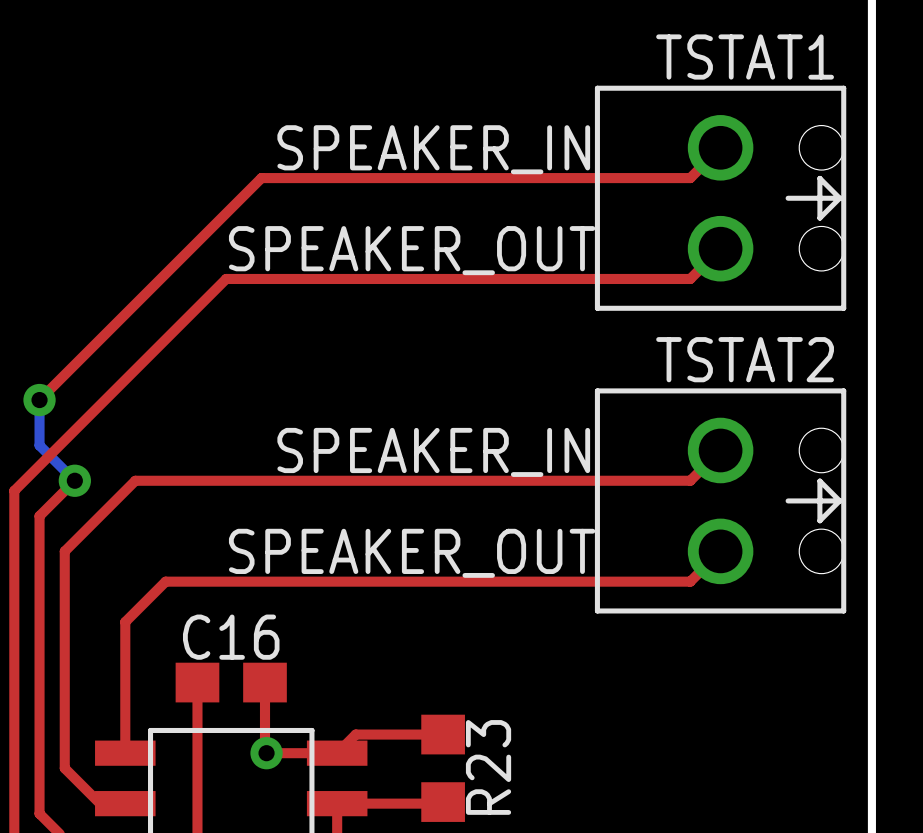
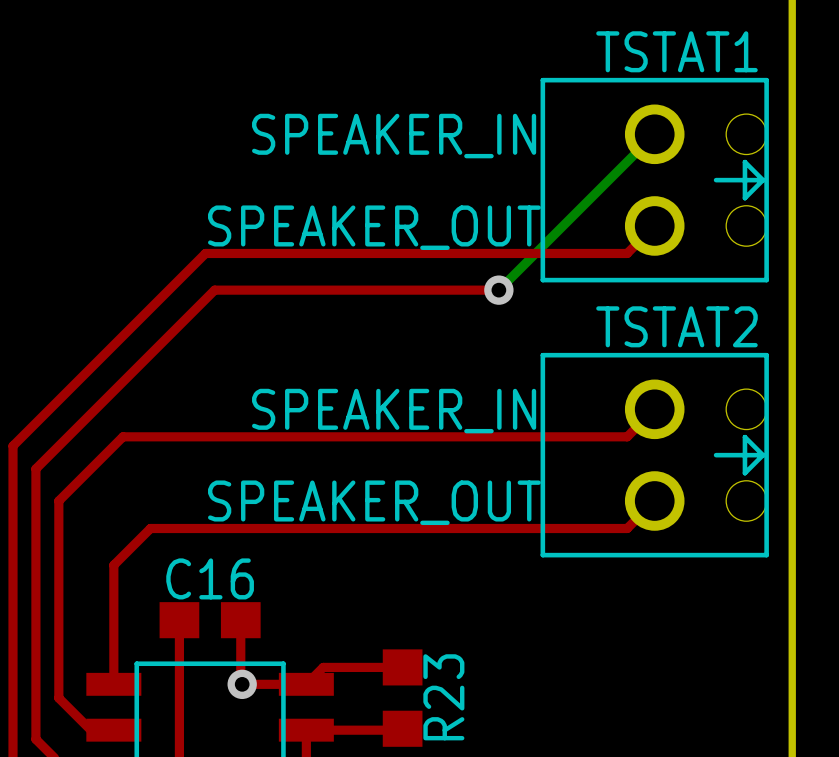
top track: (720, 147) (690, 178) (261, 178) (39, 400) -> none
bottom track: none -> (654, 134) (498, 290)
top track: none -> (498, 290) (214, 290) (68, 436)
via: none -> (498, 290)
bottom track: (39, 400) (39, 445) (74, 480) -> none
via: (39, 400) -> none
via: (74, 480) -> none

